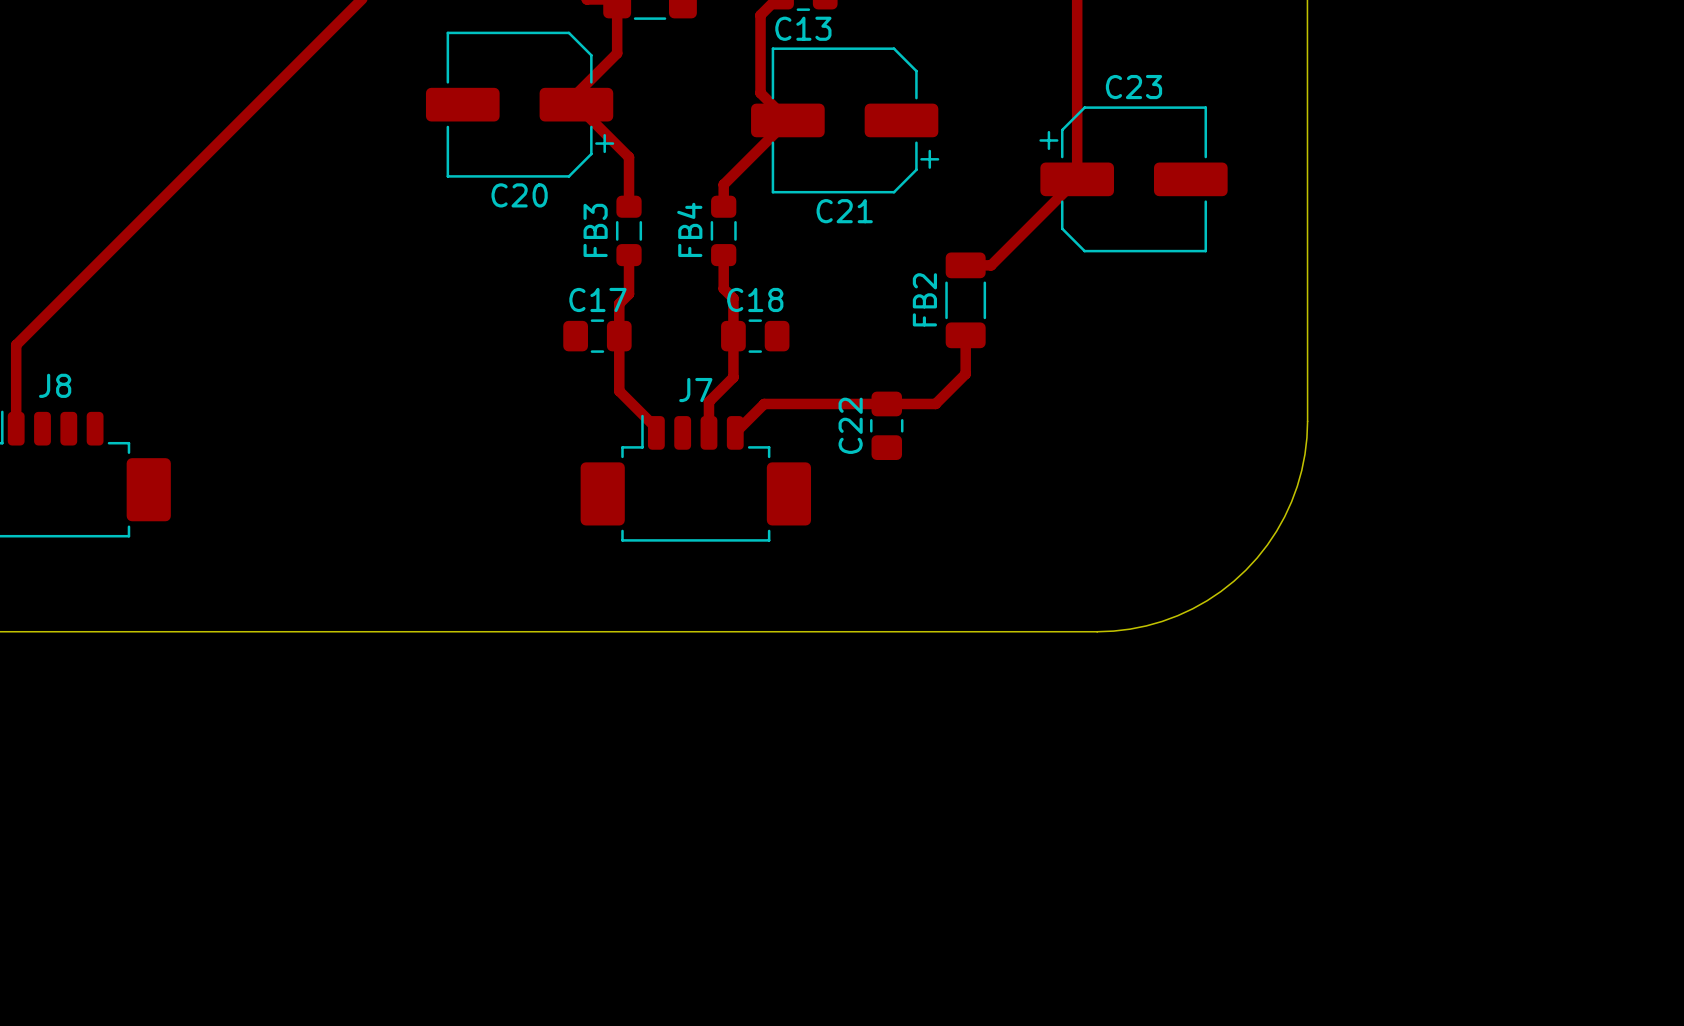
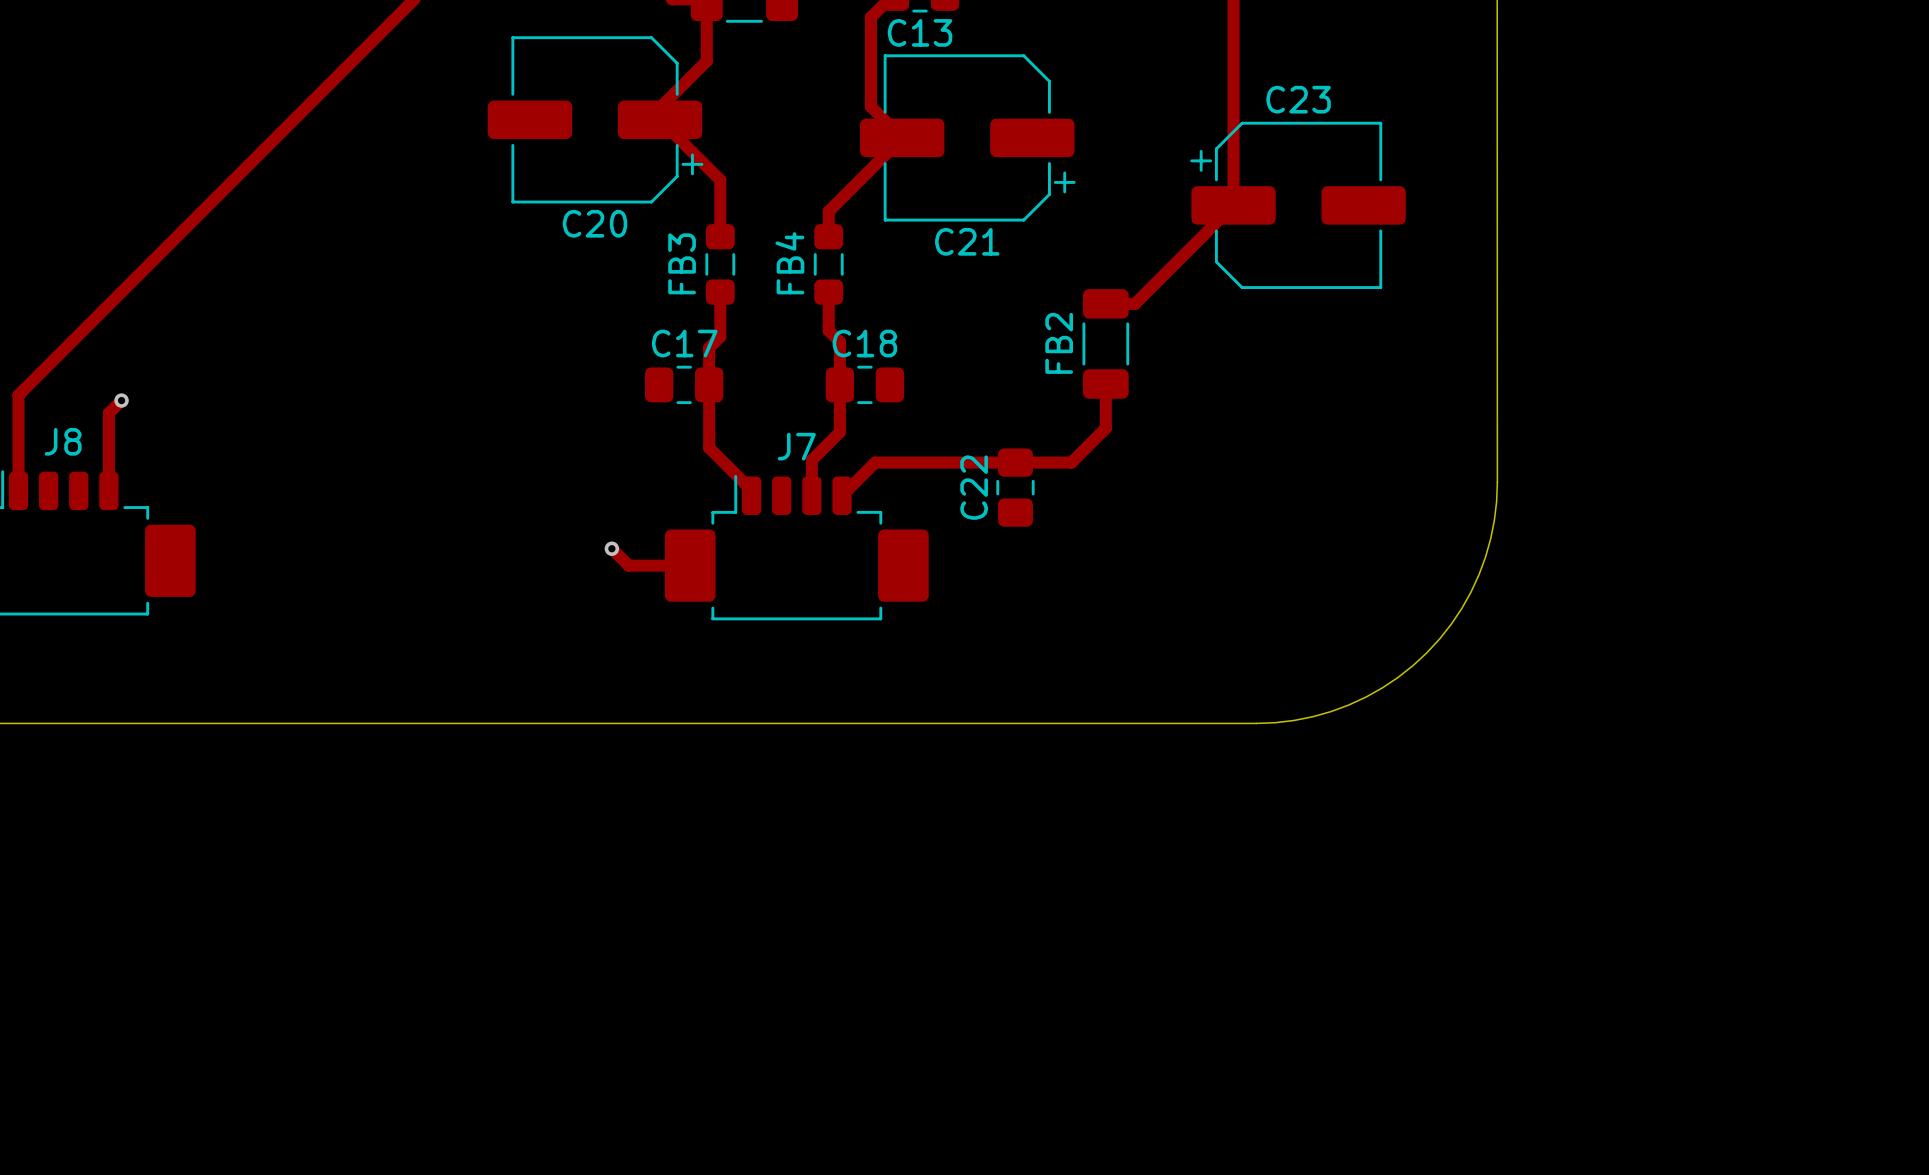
track: none -> (121, 400) (108, 413) (108, 490)
via: none -> (121, 400)
track: none -> (611, 548) (628, 565) (690, 565)
via: none -> (611, 548)

